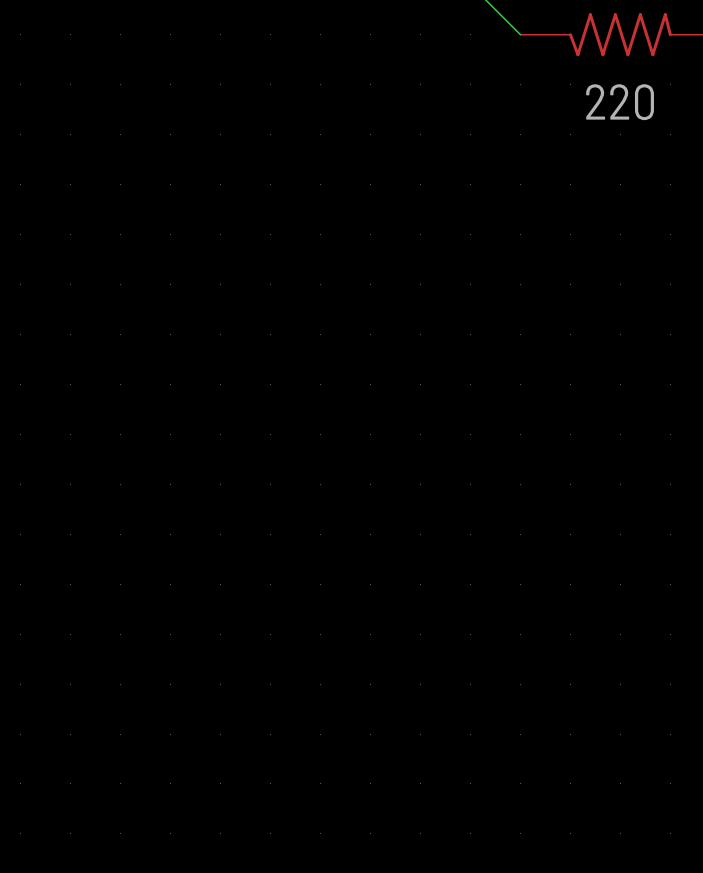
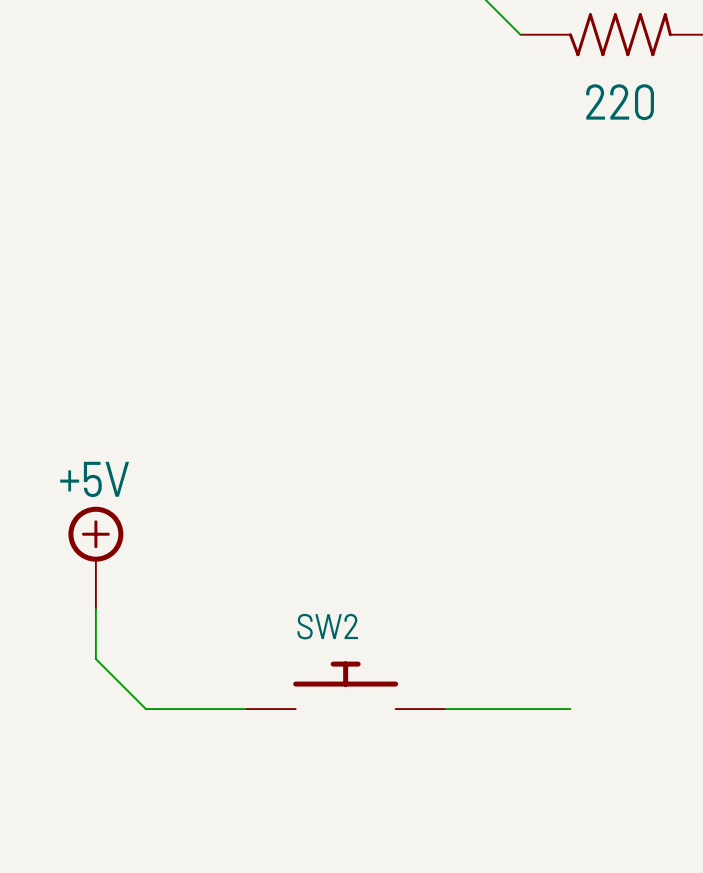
power symbol: none -> +5V (95, 557)
wire: none -> (95, 609) (95, 659) (145, 709) (245, 709)
SW2: none -> (345, 685)
wire: none -> (445, 709) (570, 709)

